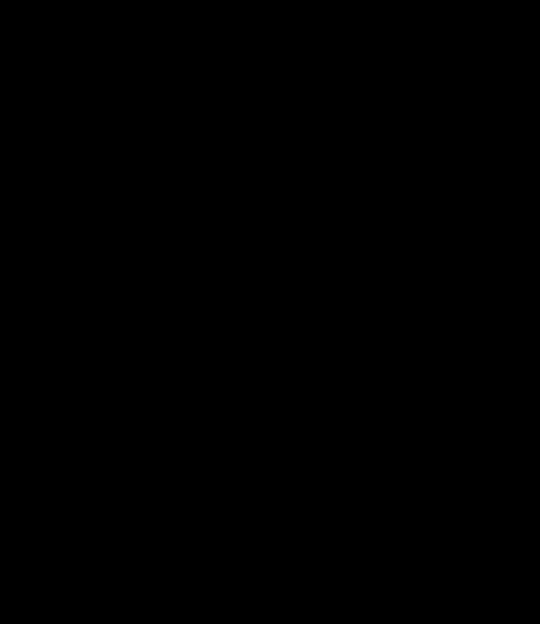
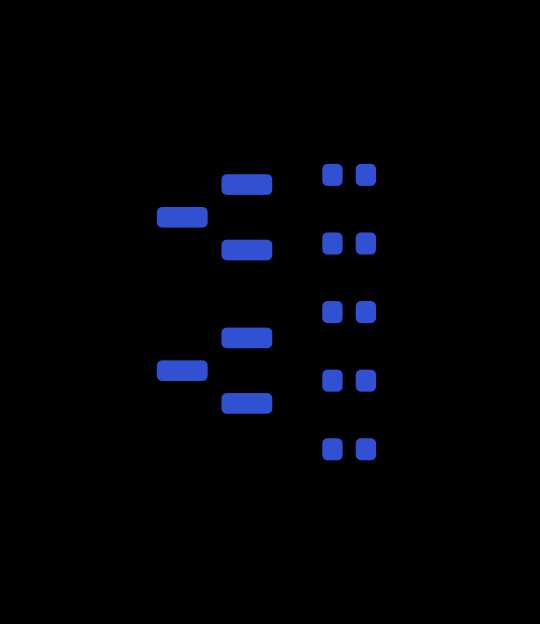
part: none -> (349, 174)
part: none -> (214, 217)
part: none -> (349, 243)
part: none -> (349, 312)
part: none -> (214, 370)
part: none -> (349, 380)
part: none -> (349, 449)

